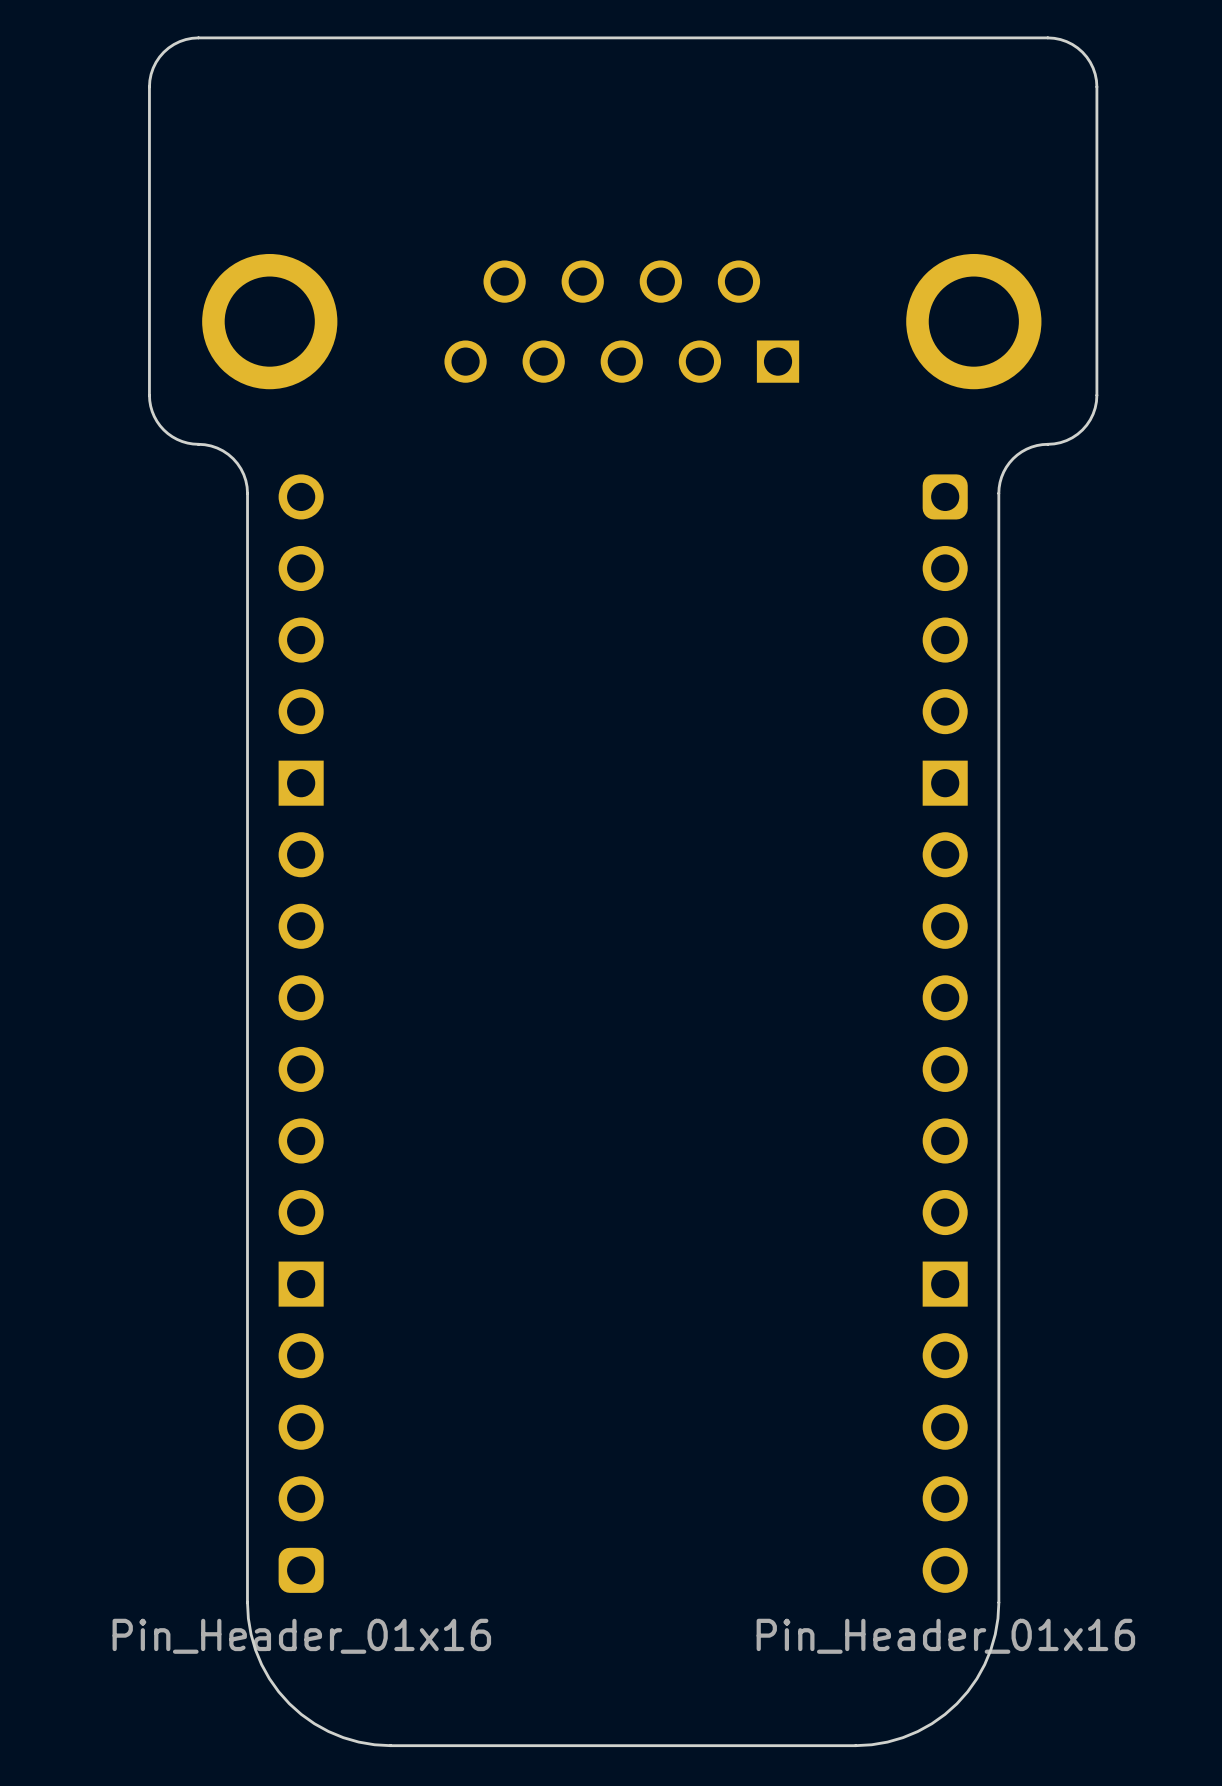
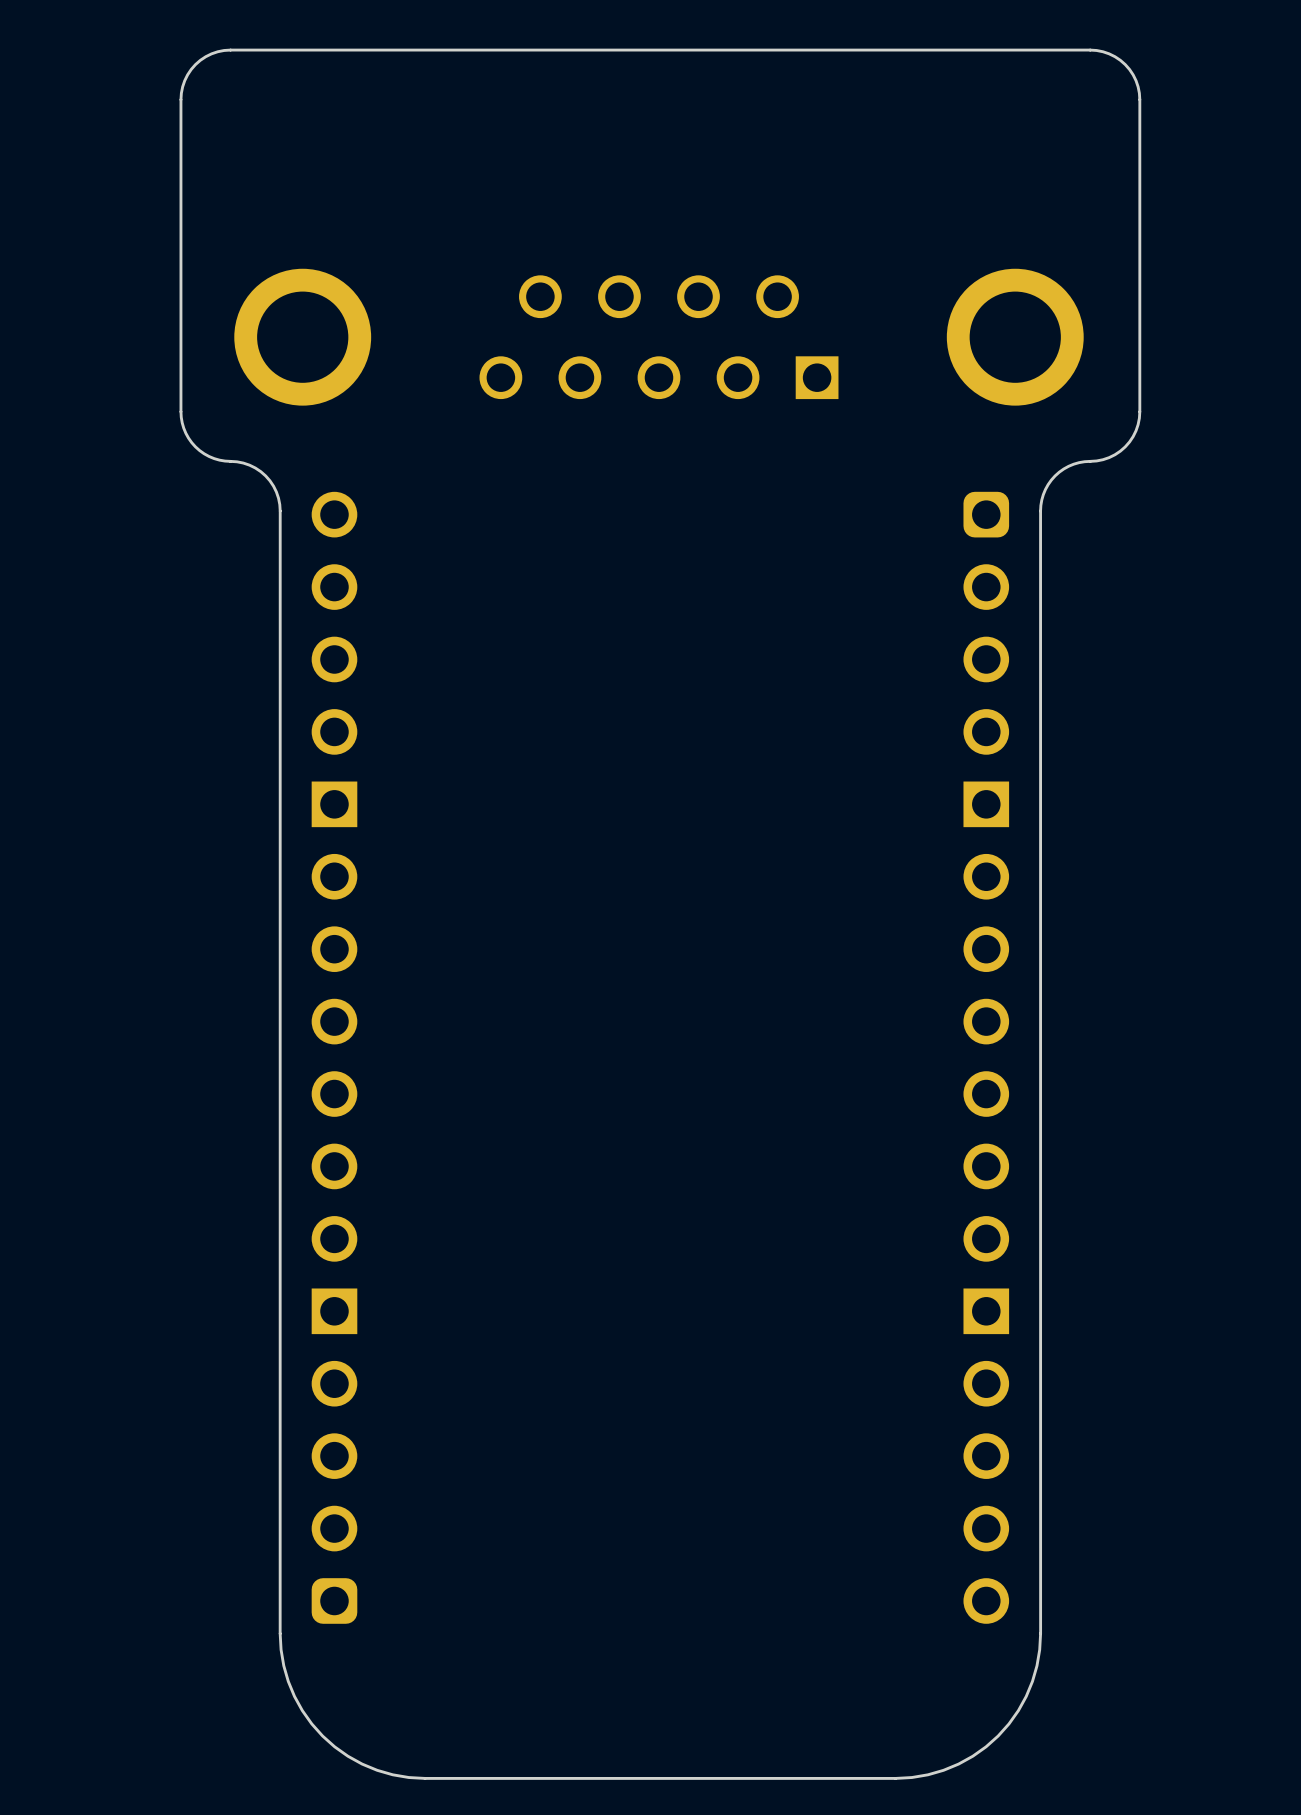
drawing: [112, 1618, 492, 1654] -> none
drawing: [756, 1618, 1136, 1654] -> none

